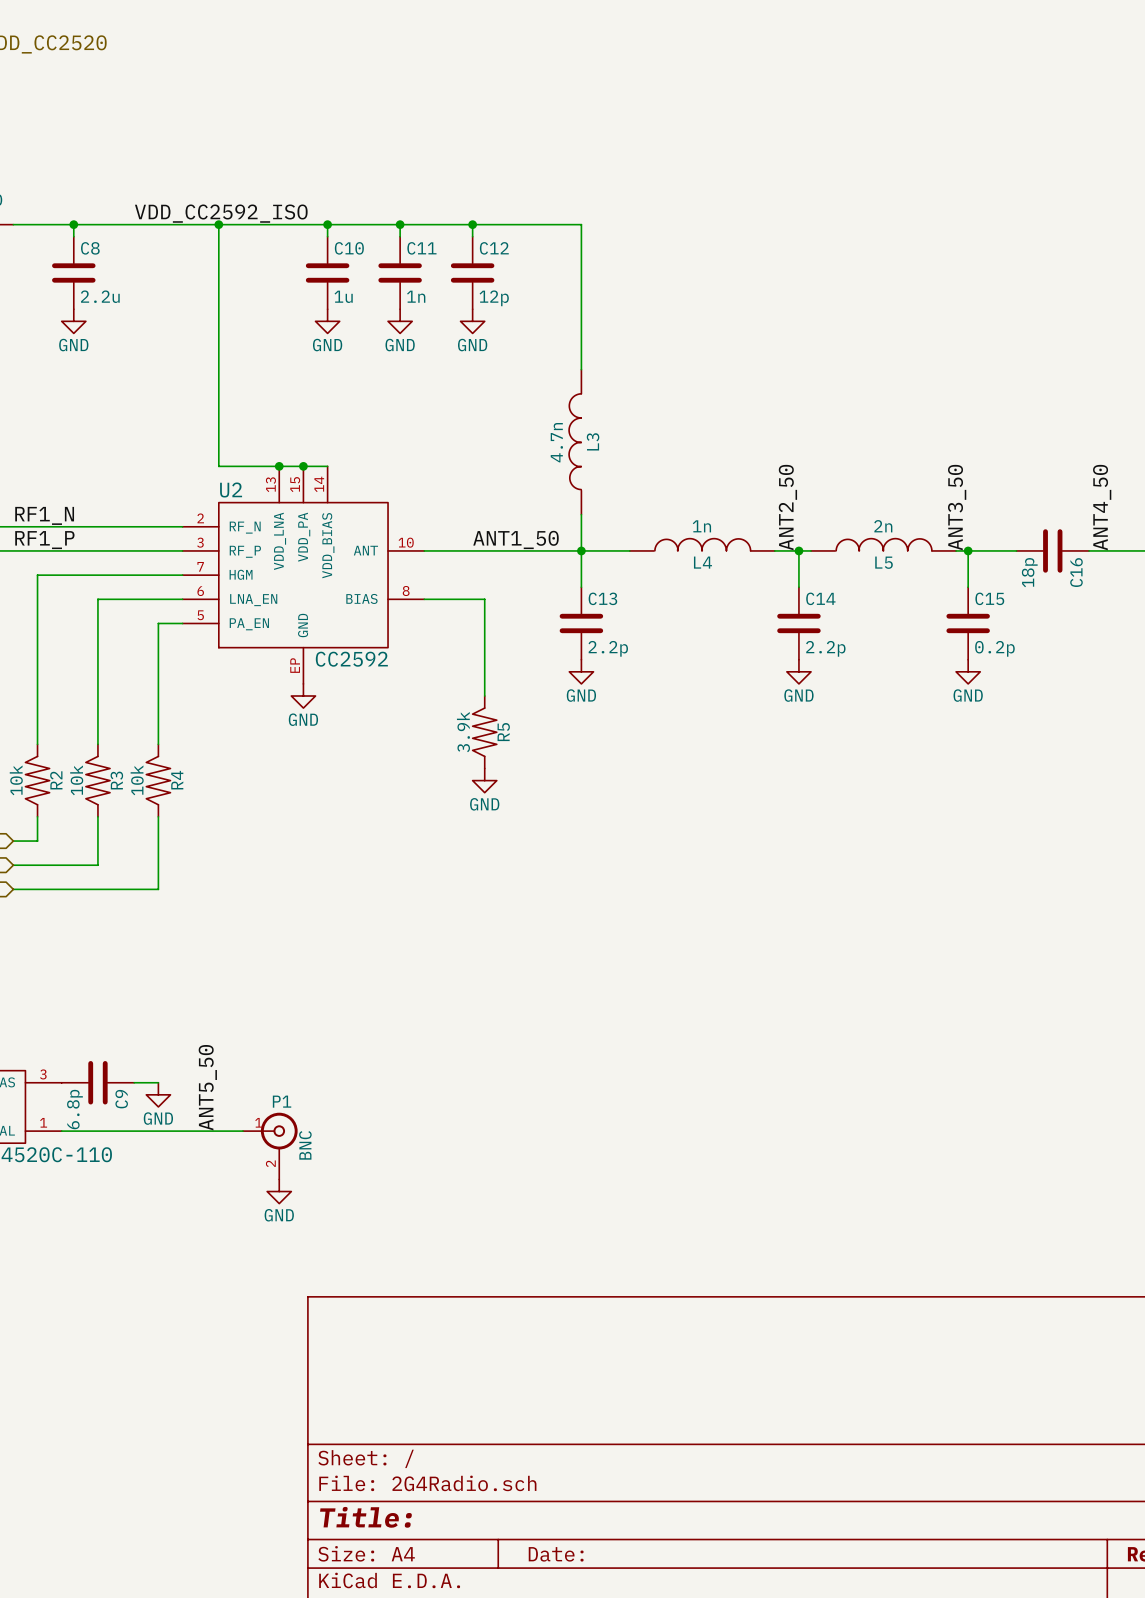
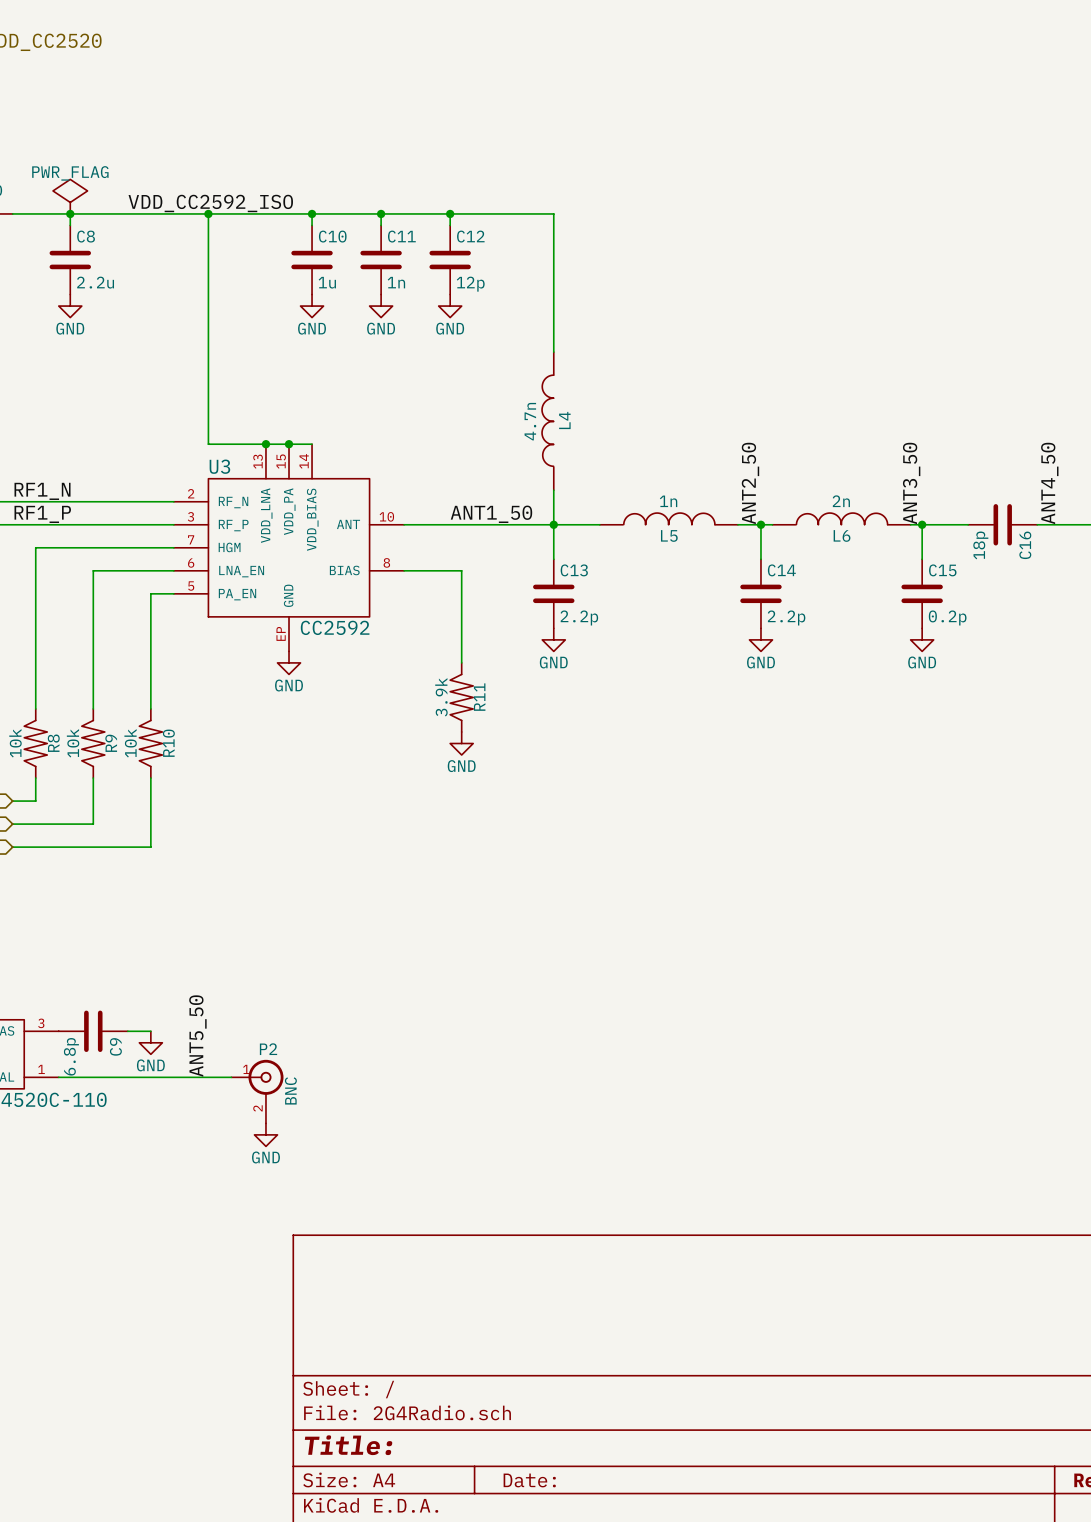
power symbol: none -> PWR_FLAG (70, 196)
L3 name: L3 (593, 441) -> L4 (564, 420)
U2 name: U2 (231, 489) -> U3 (219, 466)
L4 name: L4 (702, 562) -> L5 (669, 535)
L5 name: L5 (884, 562) -> L6 (842, 535)
R5 name: R5 (503, 732) -> R11 (479, 697)
R2 name: R2 (56, 780) -> R8 (53, 743)
R3 name: R3 (116, 780) -> R9 (111, 743)
R4 name: R4 (177, 780) -> R10 (168, 743)
P1 name: P1 (282, 1101) -> P2 (268, 1049)

